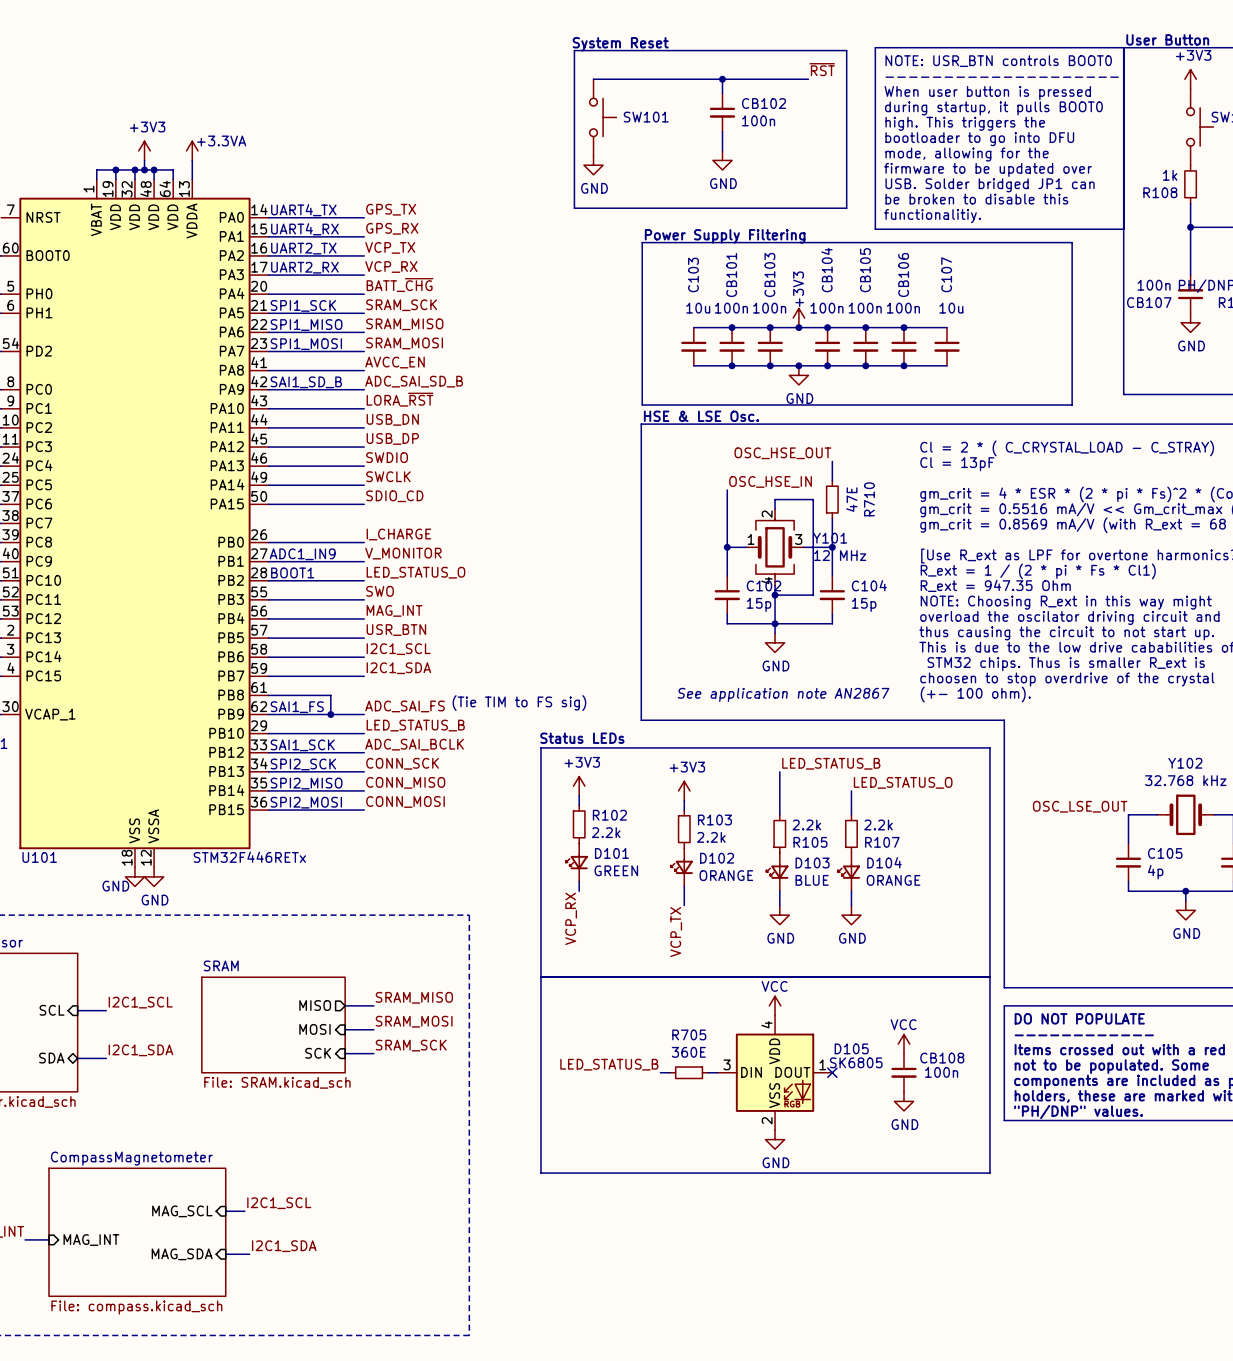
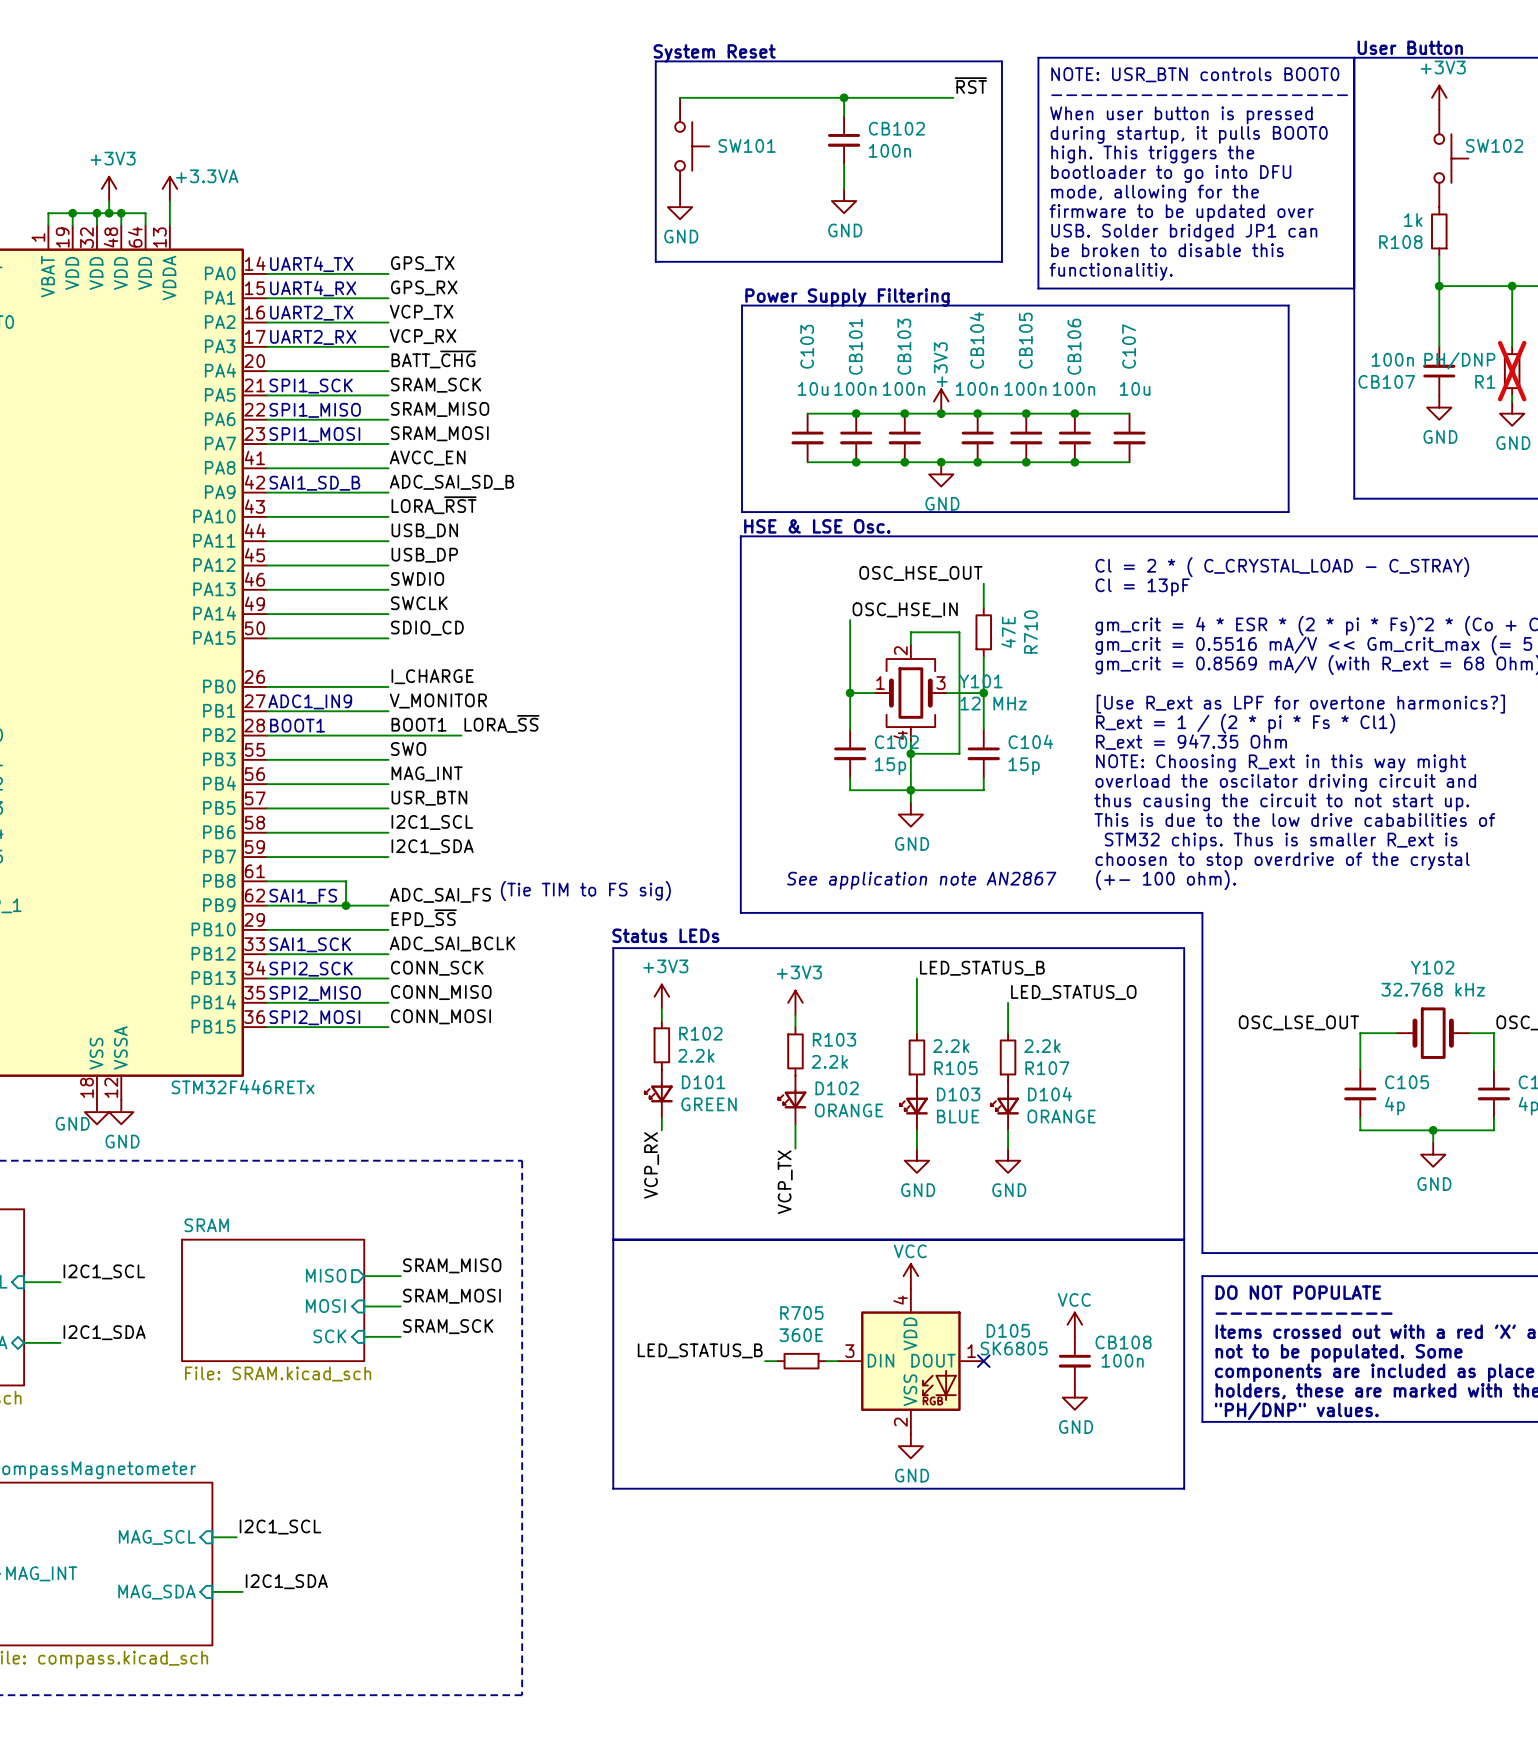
label: none -> LORA_~{SS} (501, 723)
label: LED_STATUS_O (415, 572) -> BOOT1 (418, 724)
wire: none -> (388, 735) (461, 735)
label: LED_STATUS_B (415, 725) -> EPD_~{SS} (424, 918)

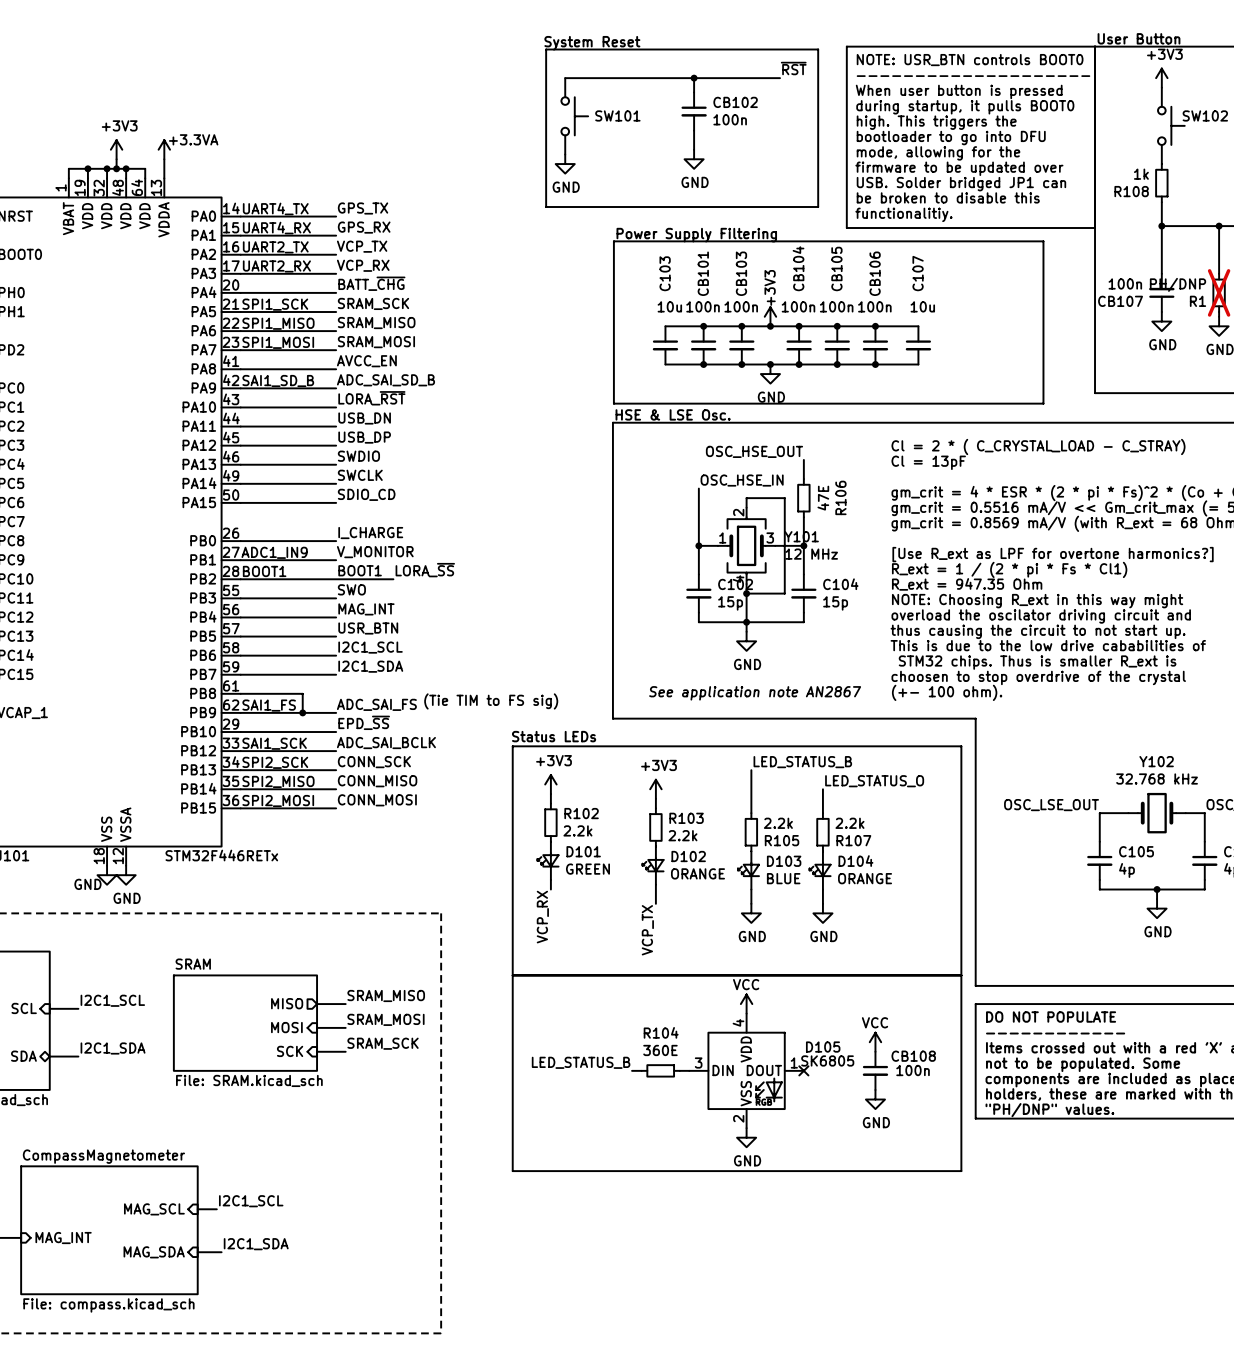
R710 name: R710 (1030, 632) -> R106 (840, 497)
R705 name: R705 (801, 1313) -> R104 (661, 1032)

